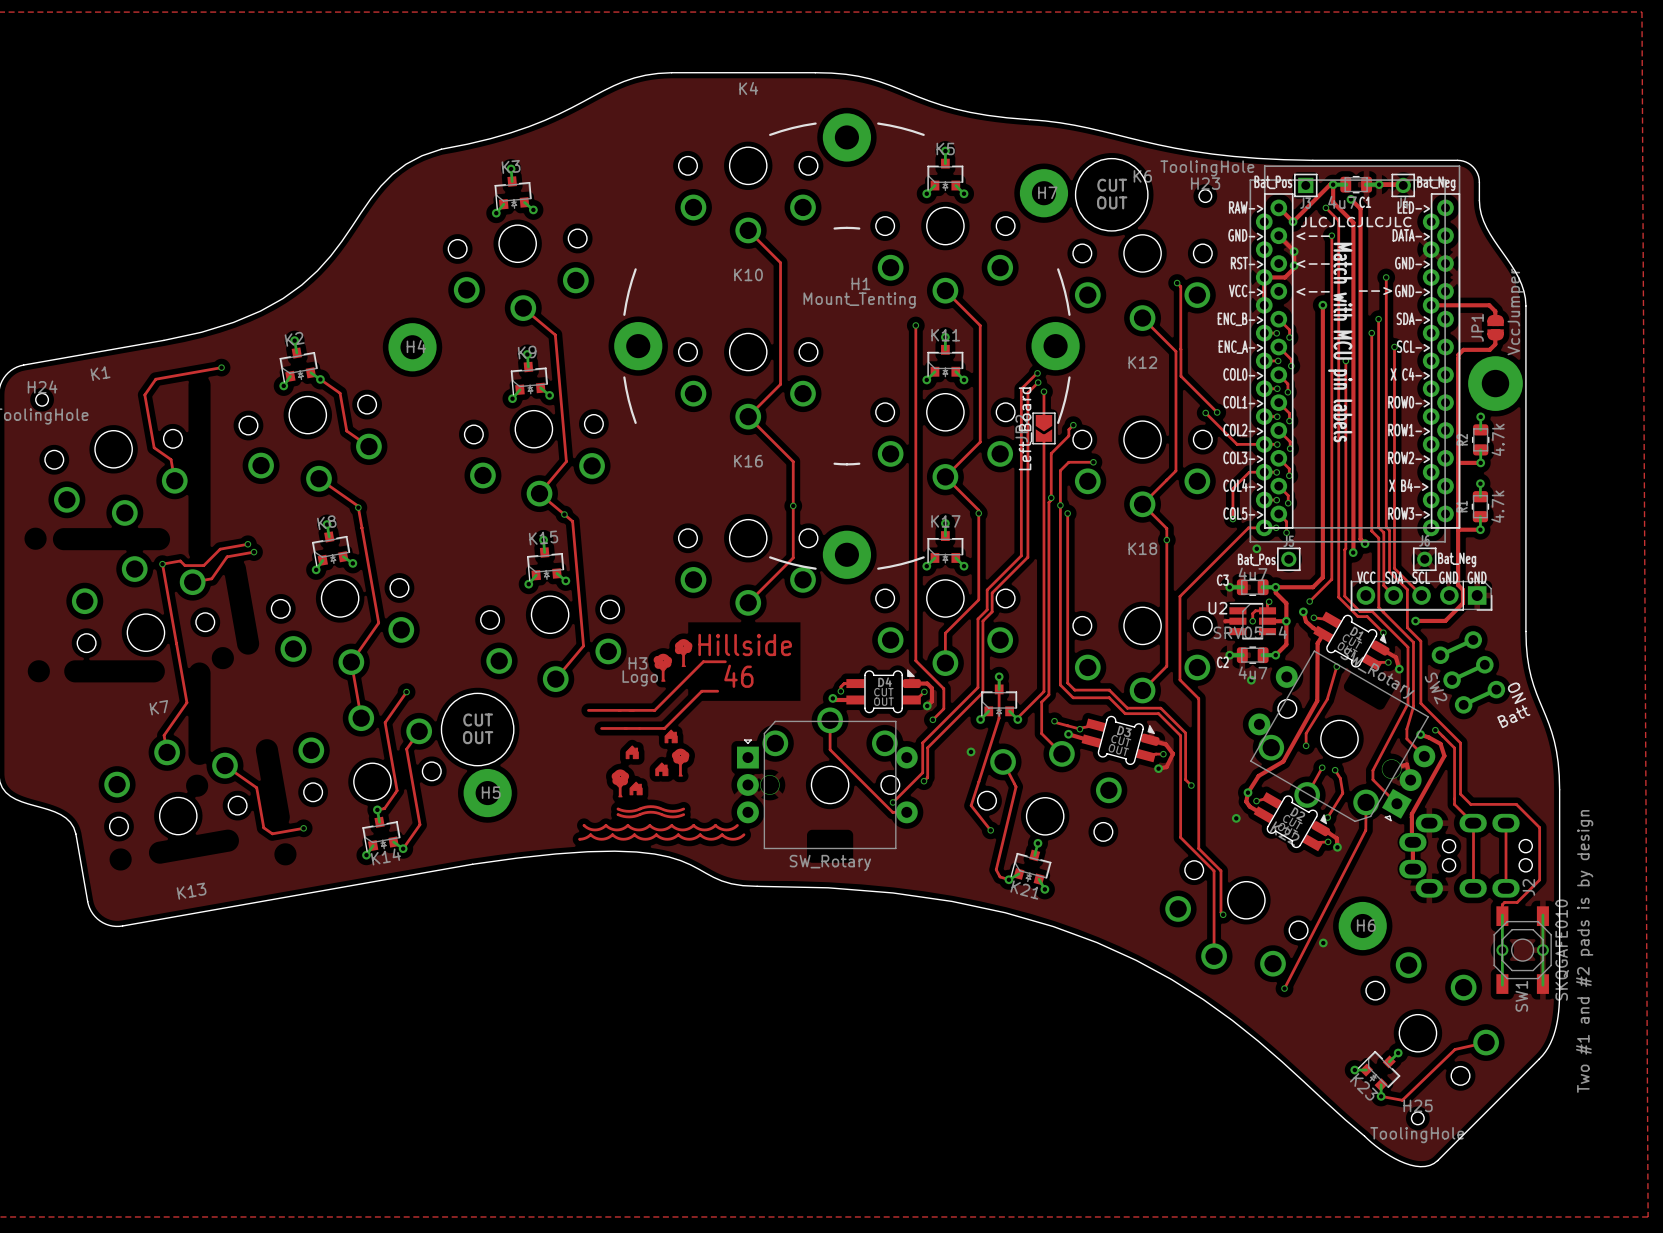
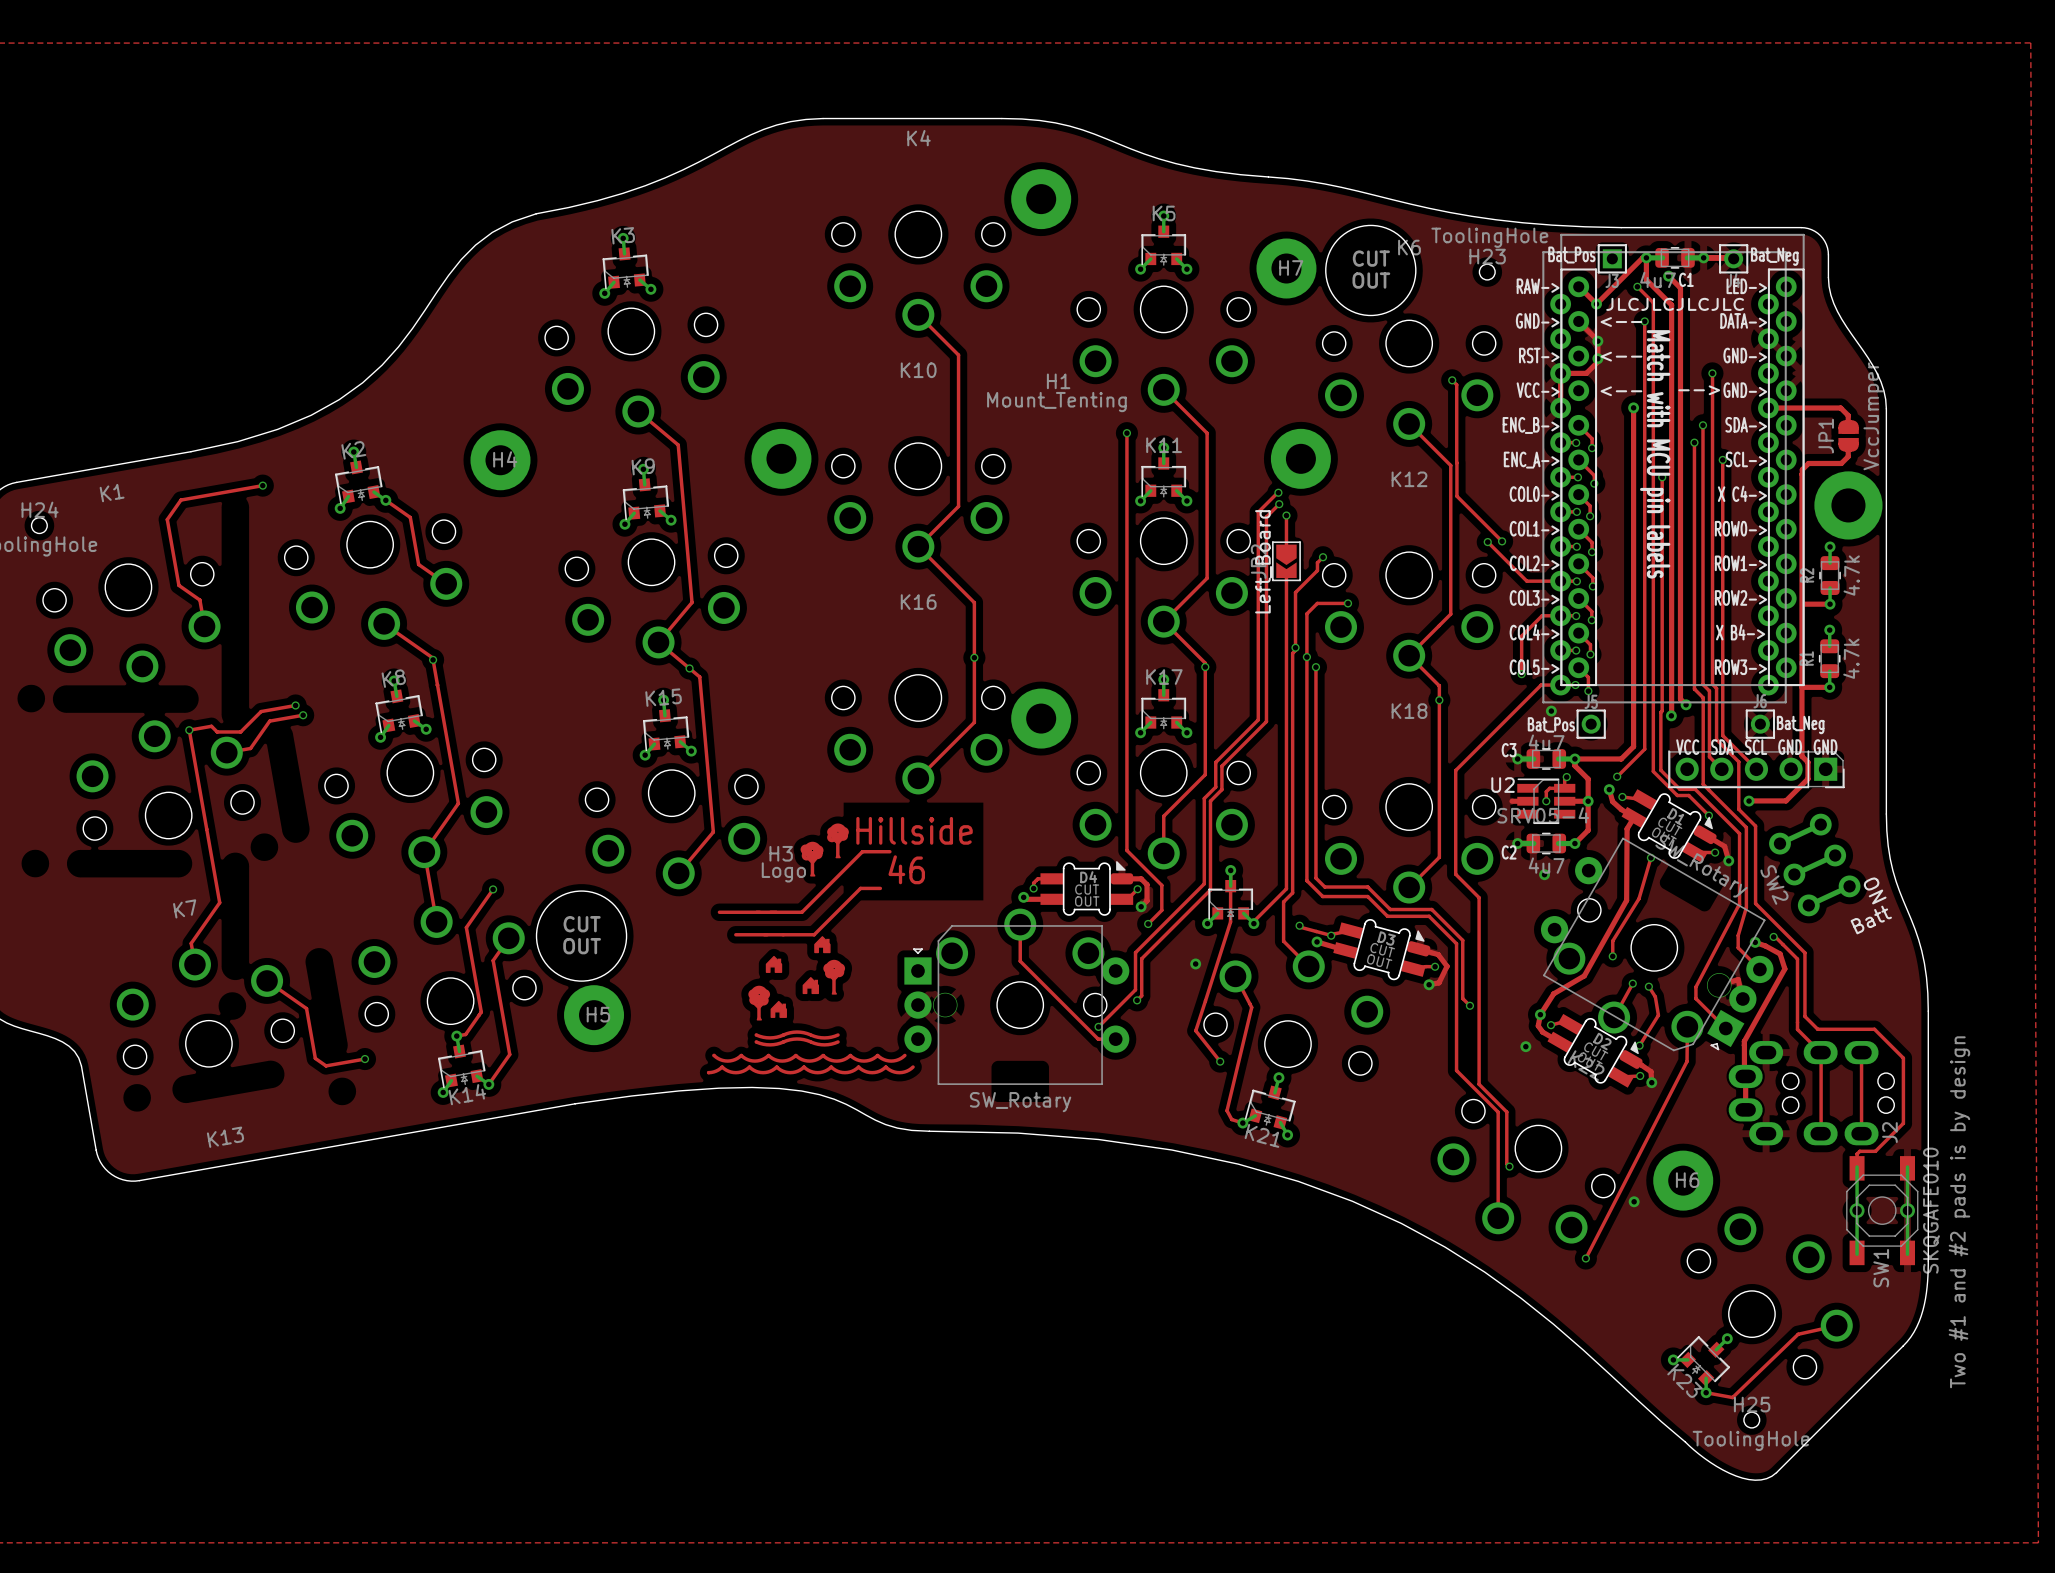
H1 footprint: [614, 113, 1080, 579] -> [751, 169, 1331, 749]

